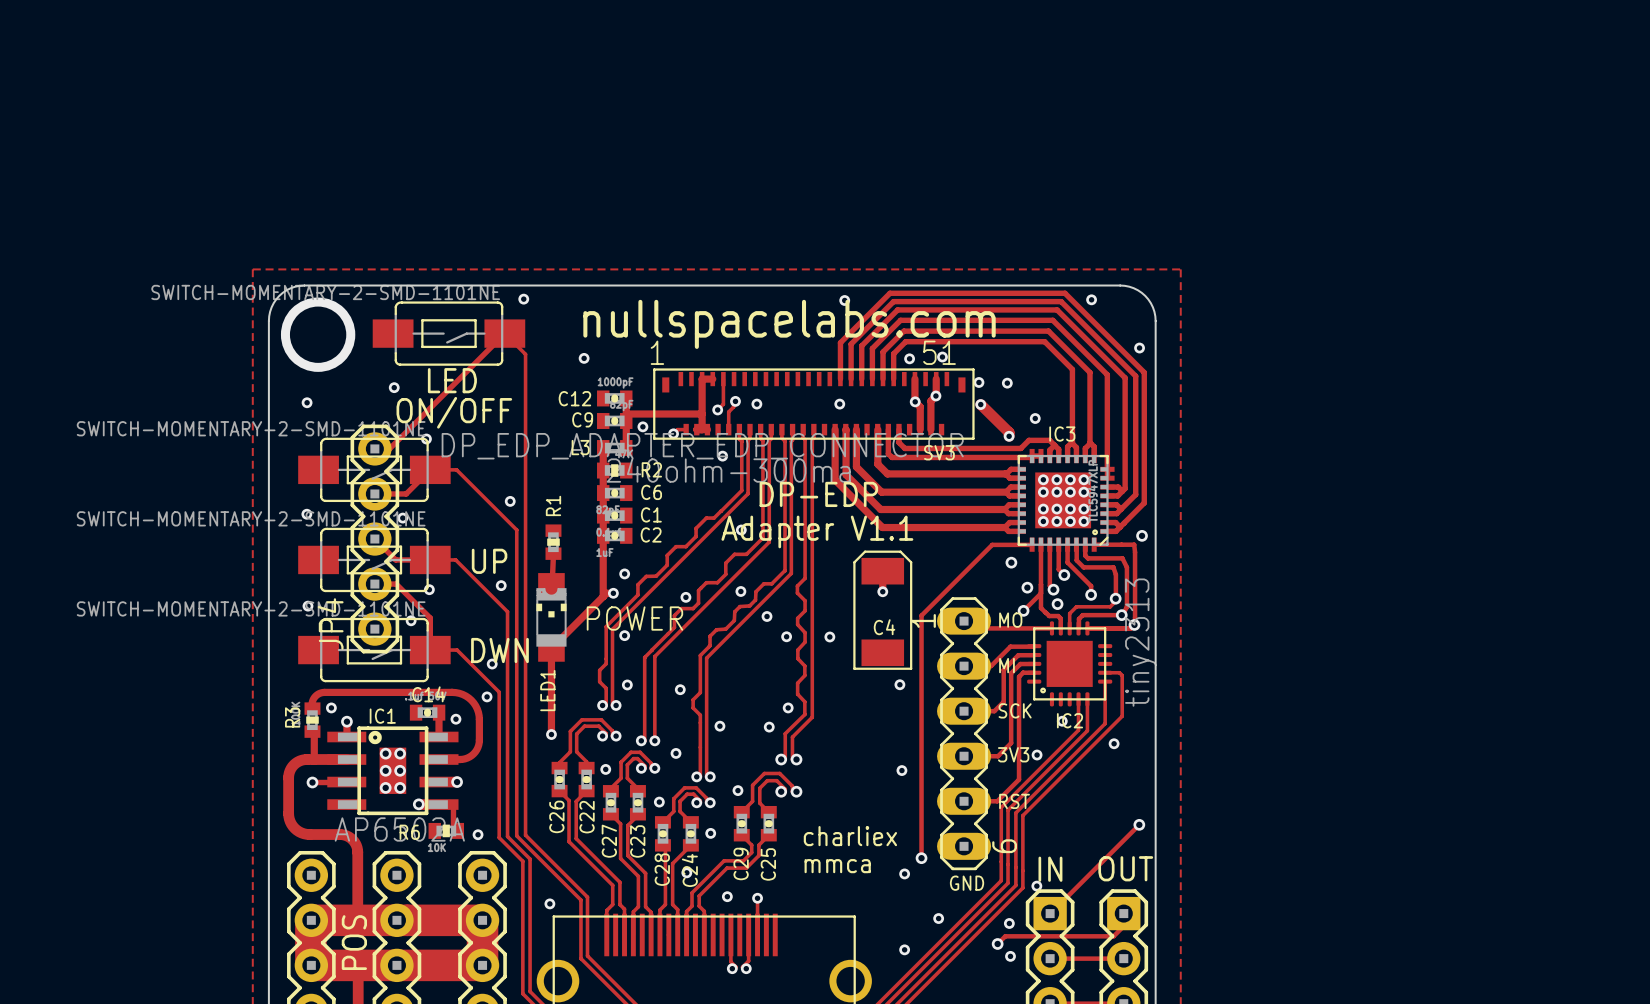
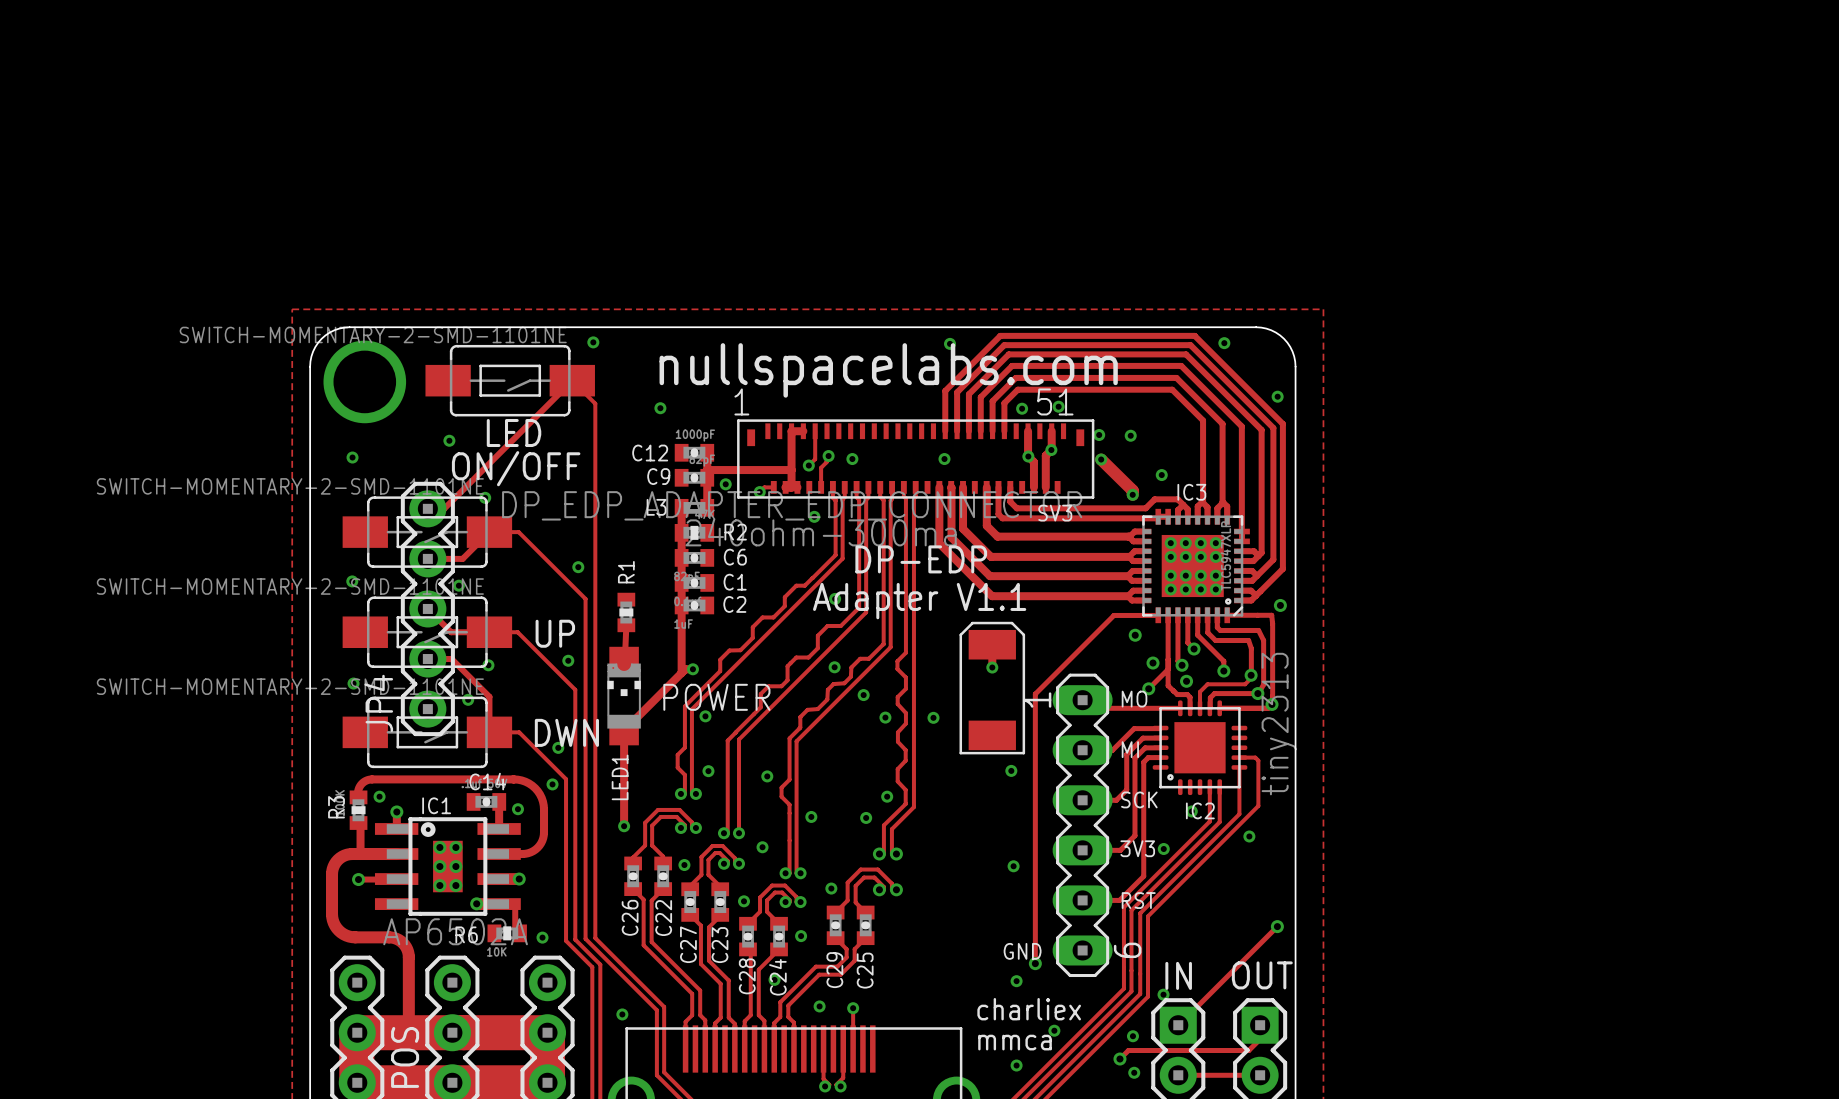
via: (624, 573) -> none
via: (685, 597) -> none
text: C4 (884, 627) -> none
text position: charliex (850, 836) -> charliex (1029, 1009)
text position: mmca (837, 866) -> mmca (1015, 1042)
text position: GND (967, 883) -> GND (1022, 951)

